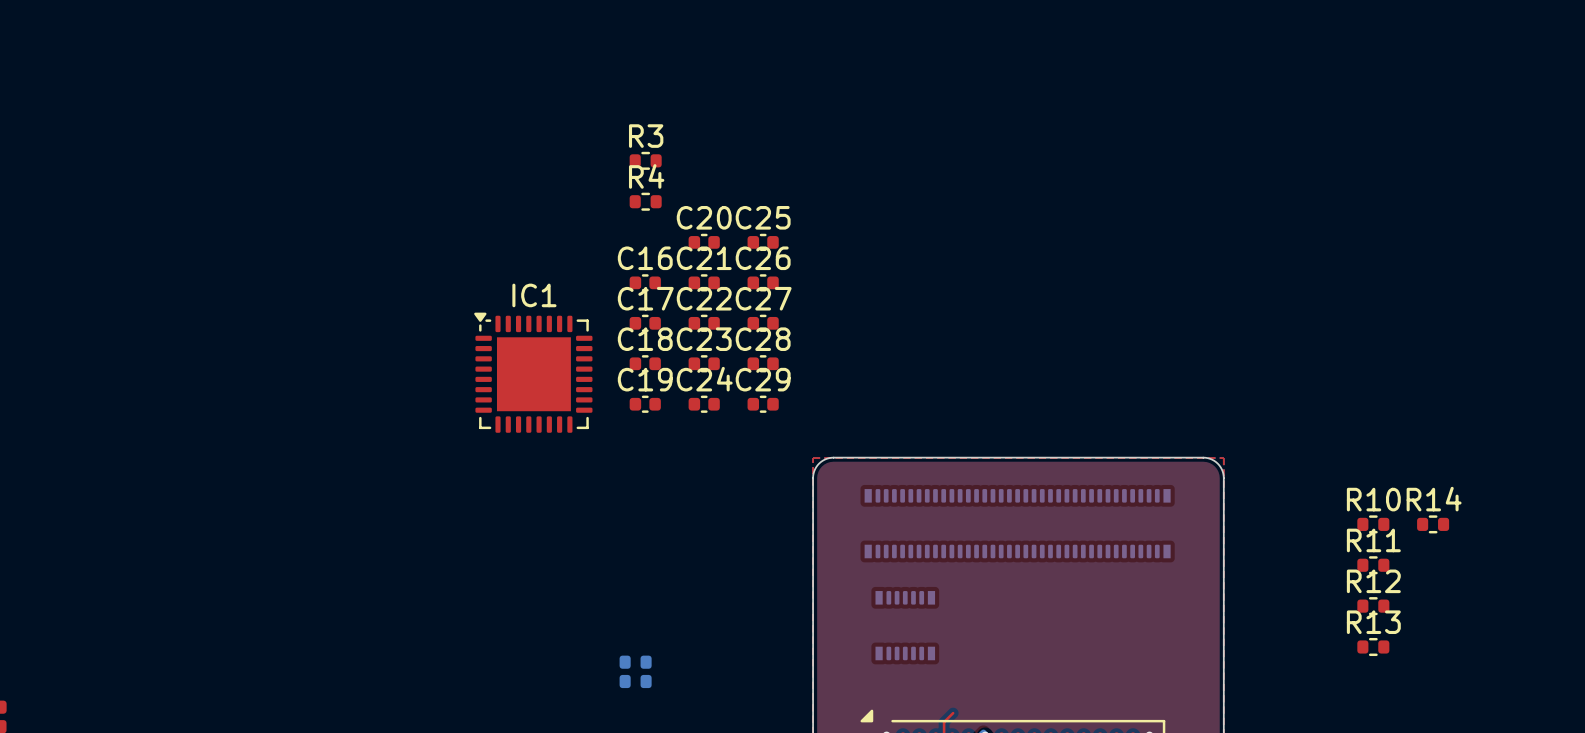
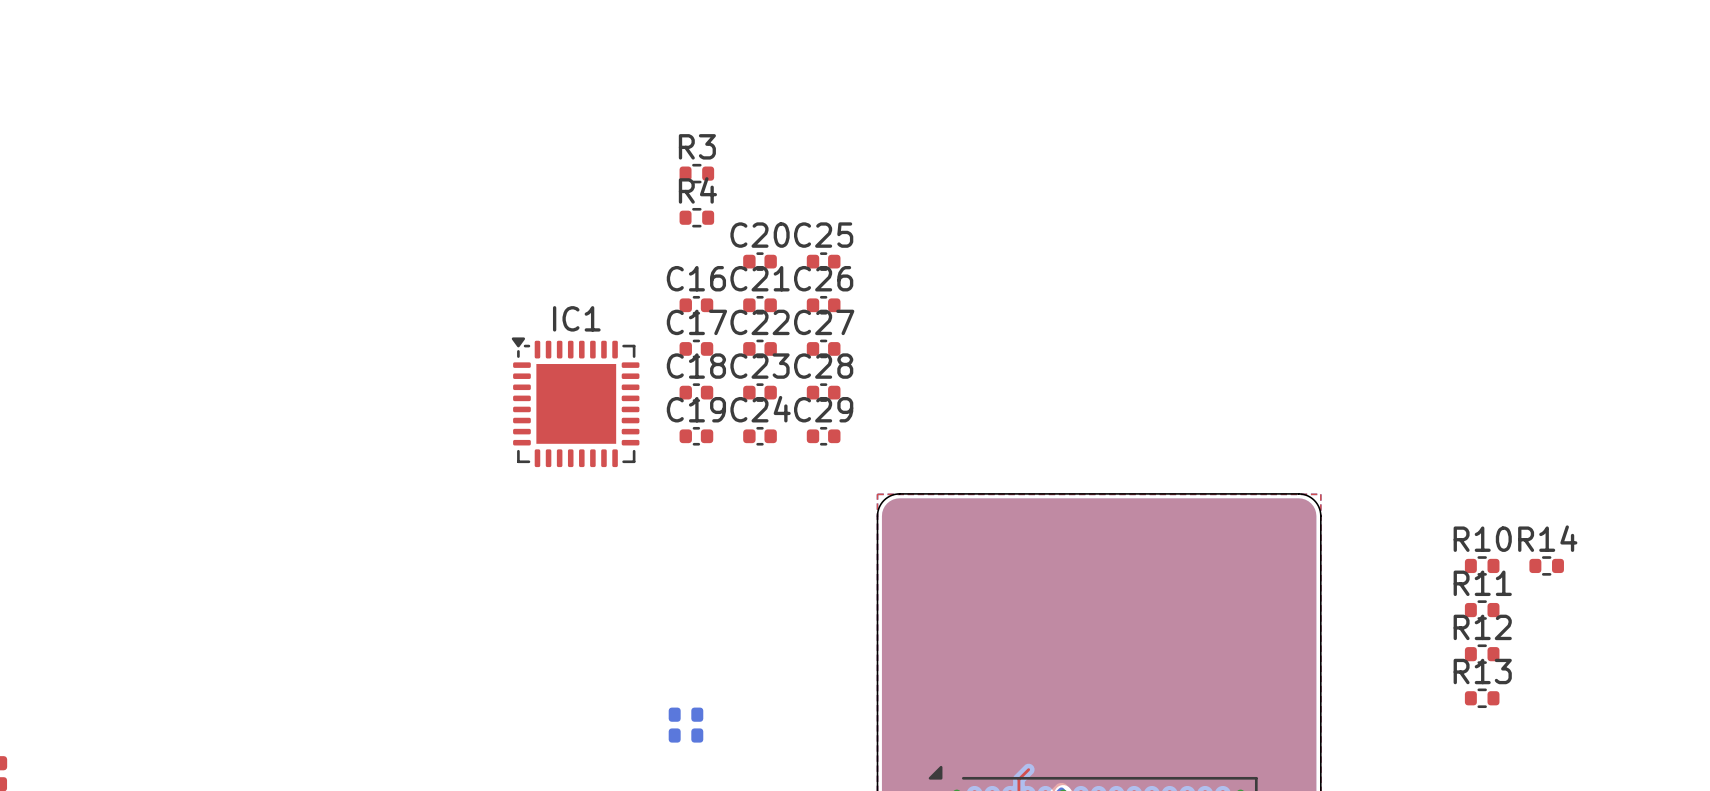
part: (1017, 523) -> none
part: (905, 625) -> none

